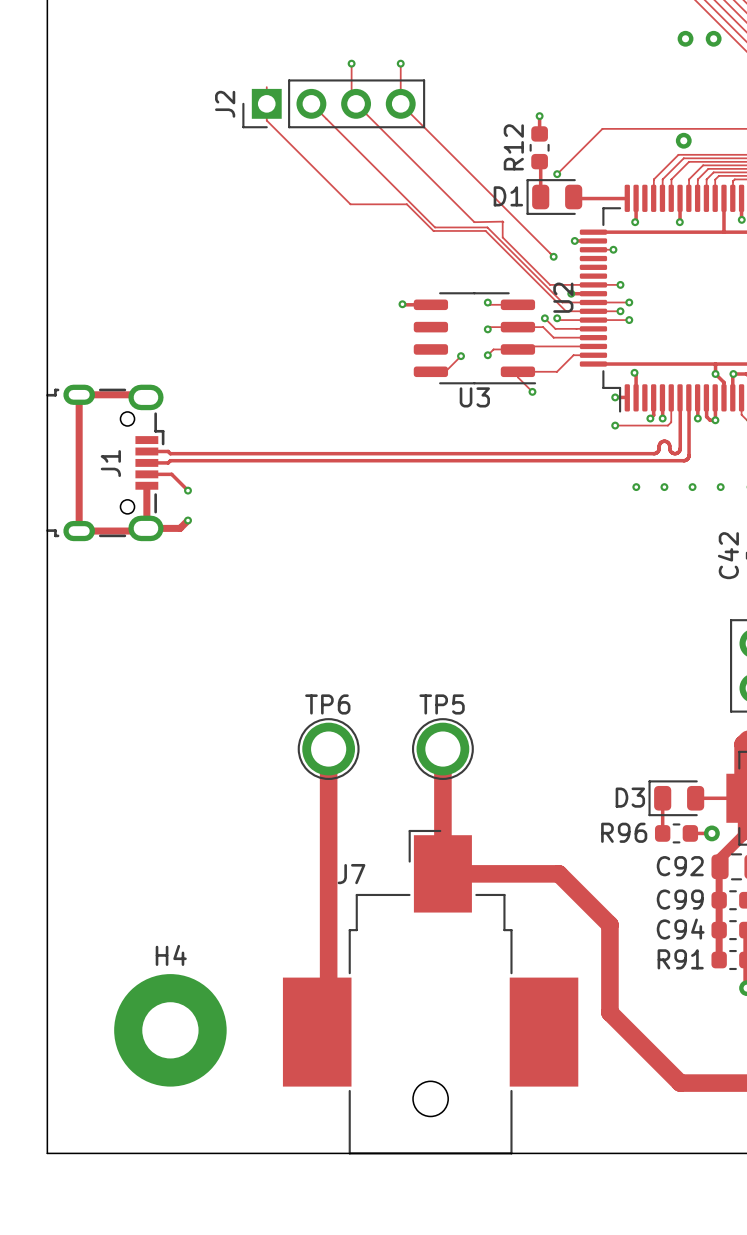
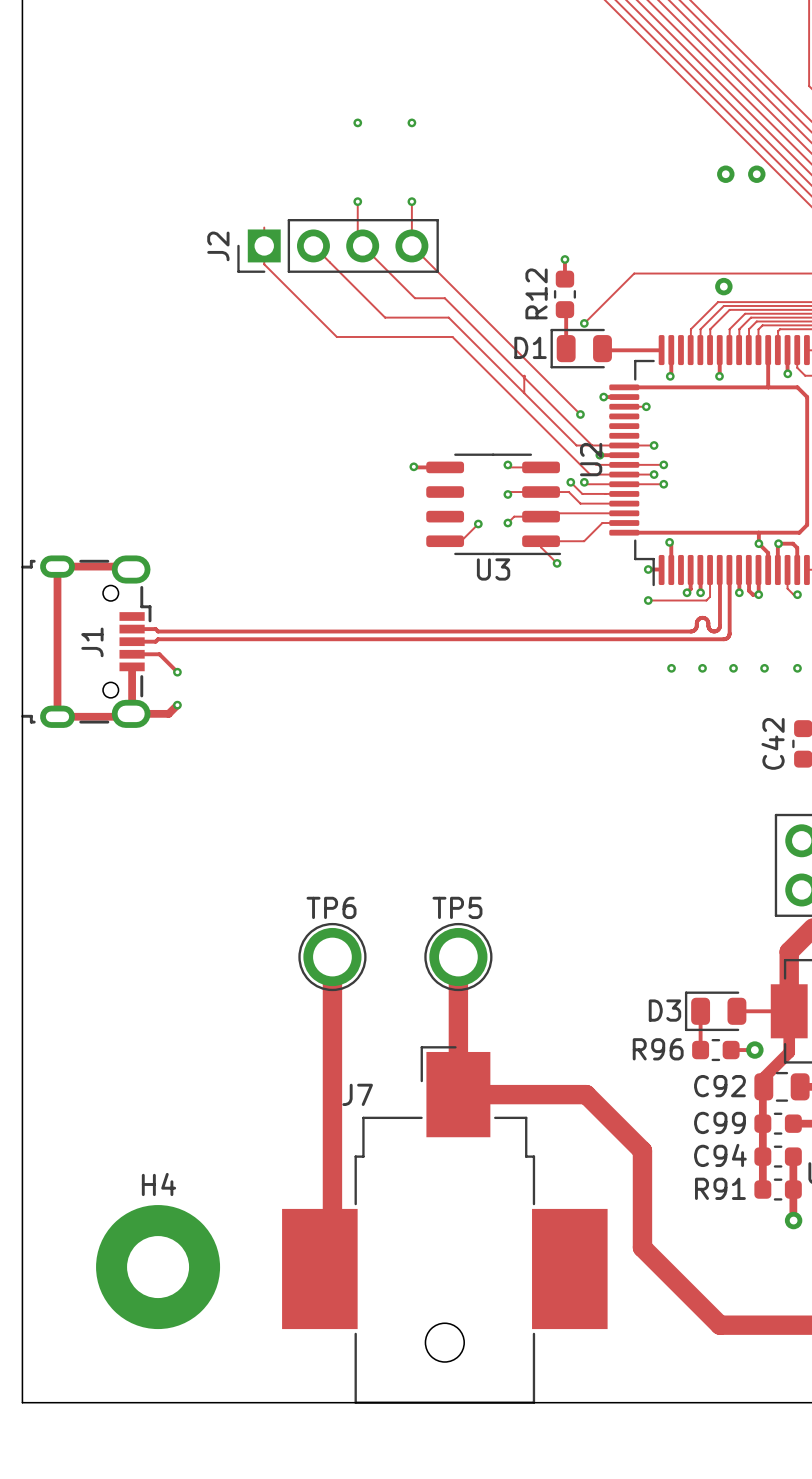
track: (403, 151) (474, 222) (502, 221) -> (414, 298) (444, 298) (592, 445)
track: (376, 168) (435, 227) (487, 227) (562, 302) (567, 302) -> (385, 317) (448, 317) (524, 393)
track: (332, 186) (350, 204) (406, 204) (433, 230) (485, 230) (565, 311) -> (336, 336) (452, 336) (590, 474) (594, 474)

